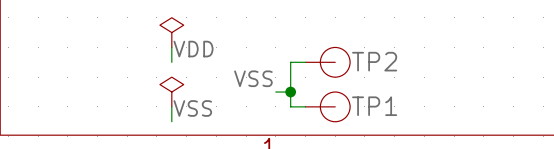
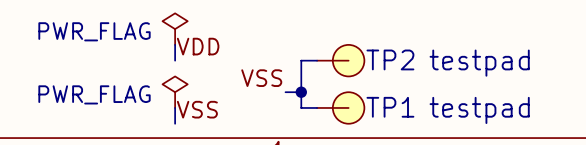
power symbol text: none -> PWR_FLAG (94, 31)
TP2 value: none -> testpad (479, 63)
power symbol text: none -> PWR_FLAG (94, 94)
TP1 value: none -> testpad (479, 110)

